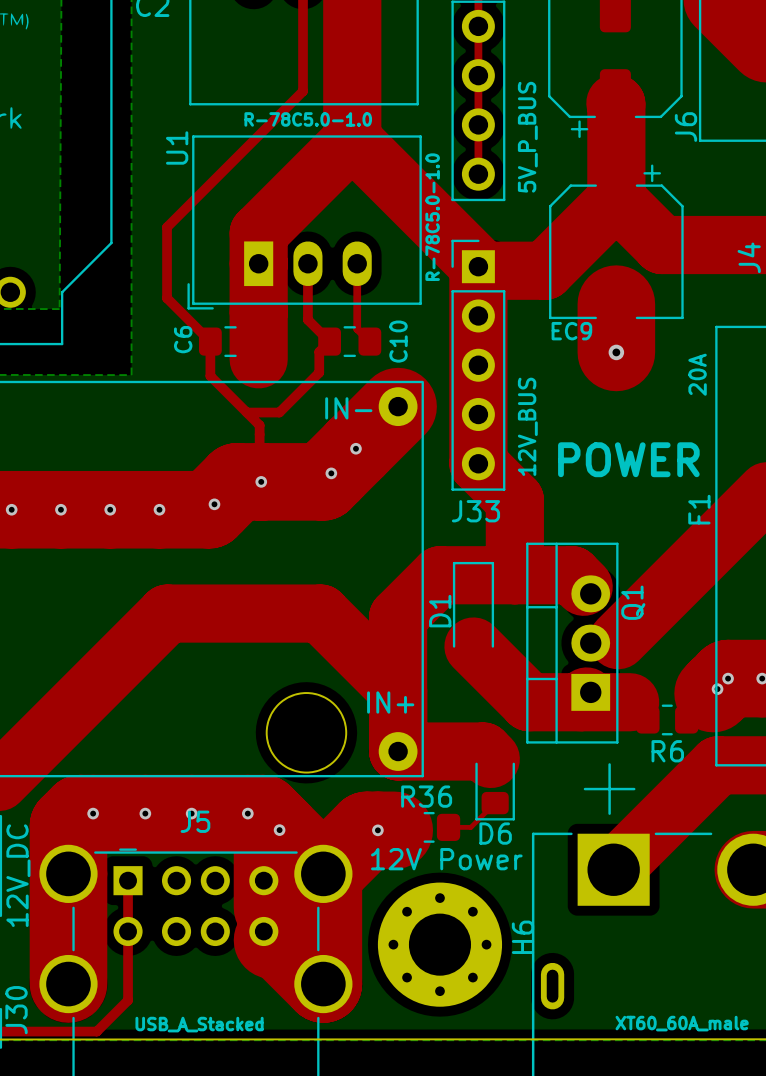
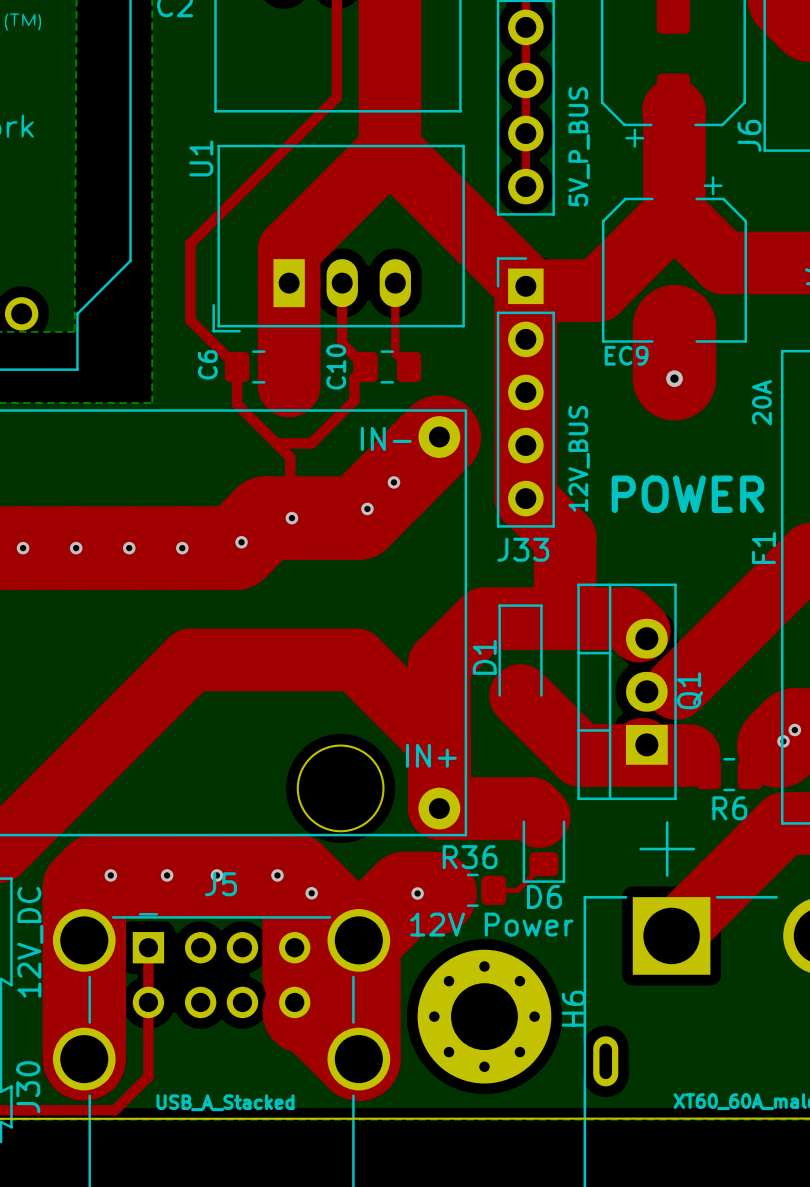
part value: R-78C5.0-1.0 (308, 119) -> none
U1 value: R-78C5.0-1.0 (432, 217) -> none
C10 name position: C10 (398, 341) -> C10 (336, 366)
Q1 name position: Q1 (633, 602) -> Q1 (690, 690)

